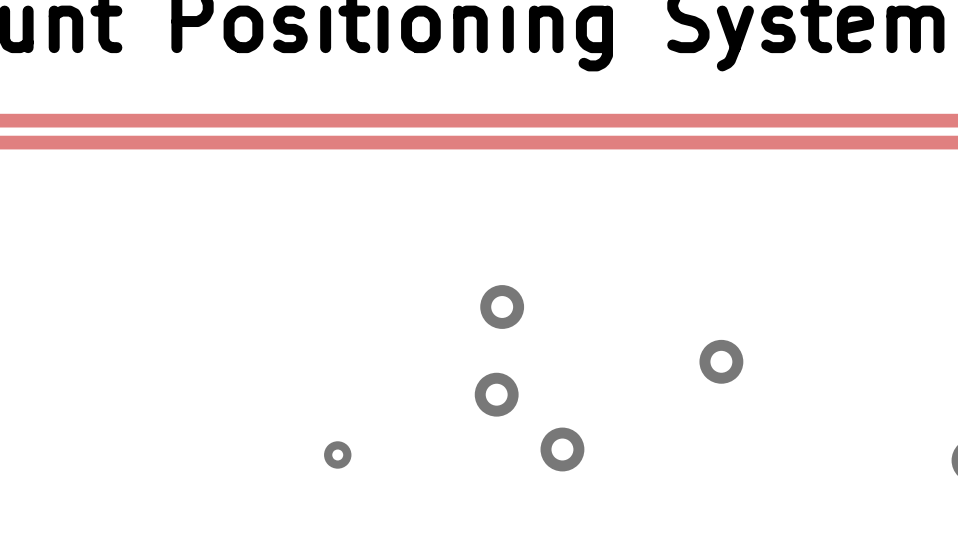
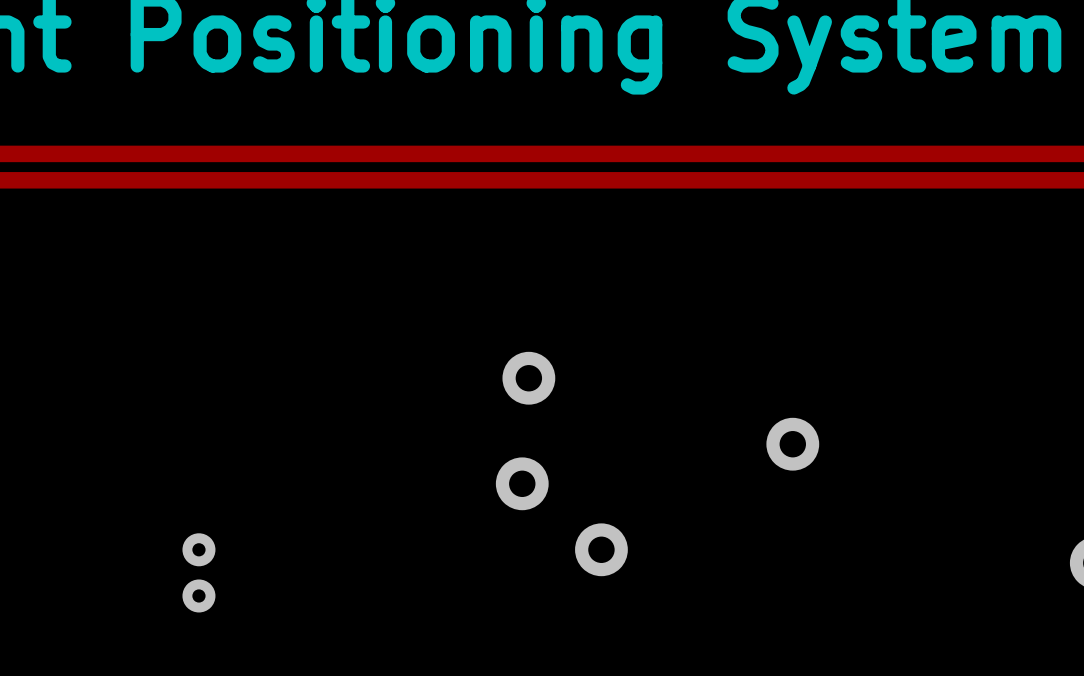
via: none -> (198, 549)
via: (337, 454) -> none
via: none -> (198, 595)

